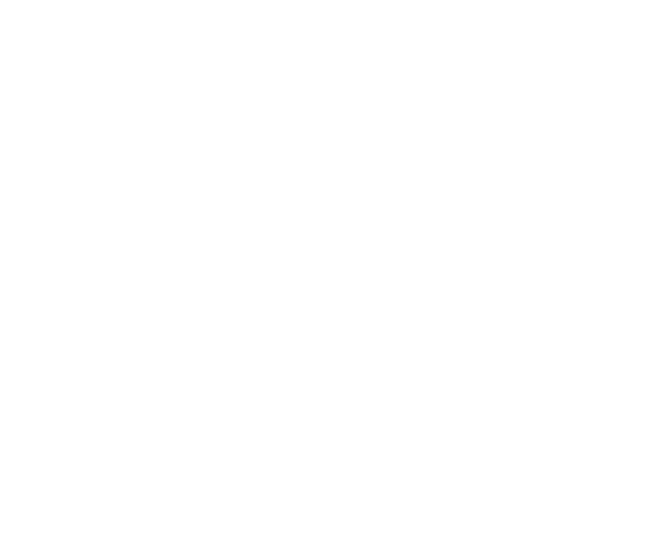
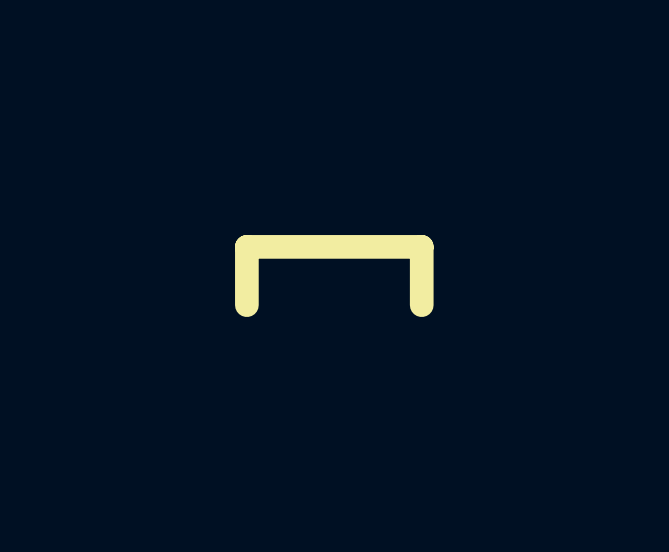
line: none -> (246, 305) (246, 246) (421, 246) (421, 305)

